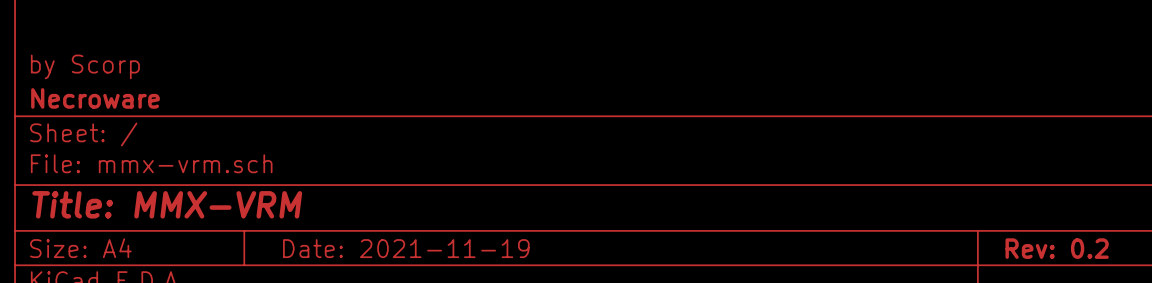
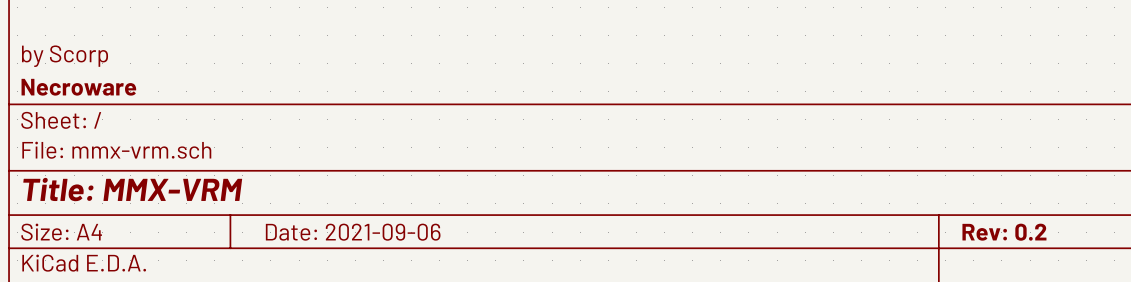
title block: Date: 2021-11-19 (406, 248) -> Date: 2021-09-06 (353, 232)

